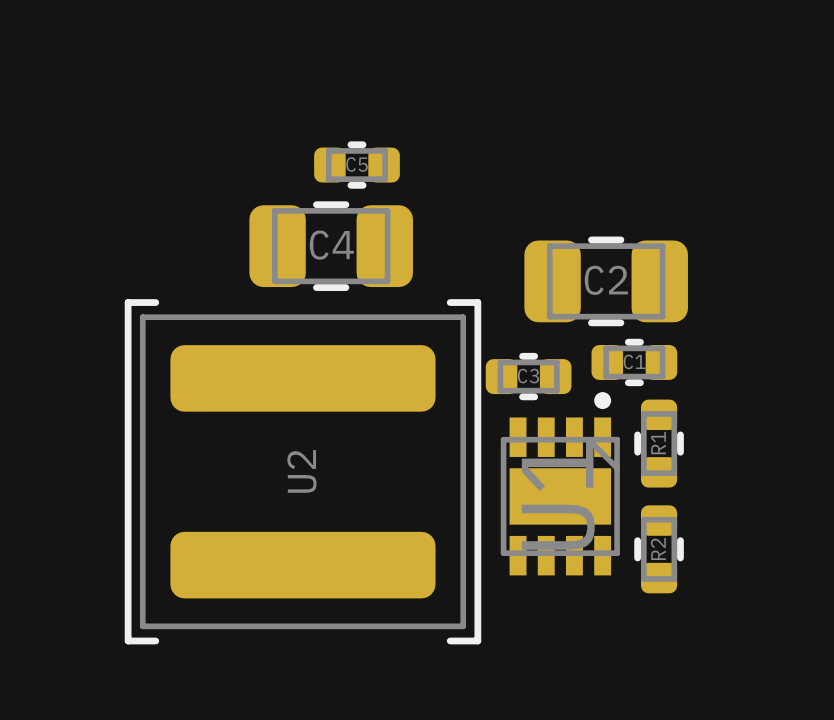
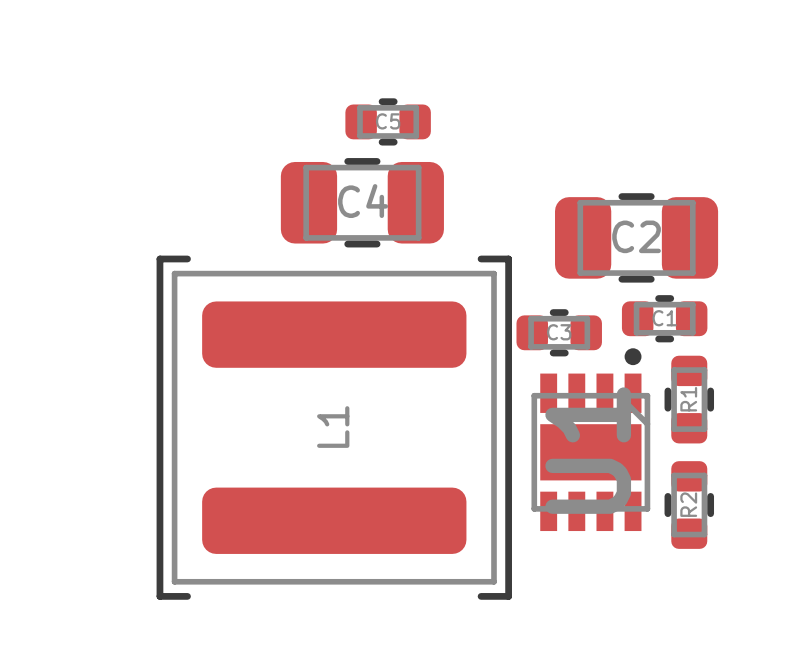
U2 name: U2 (301, 471) -> L1 (333, 427)

